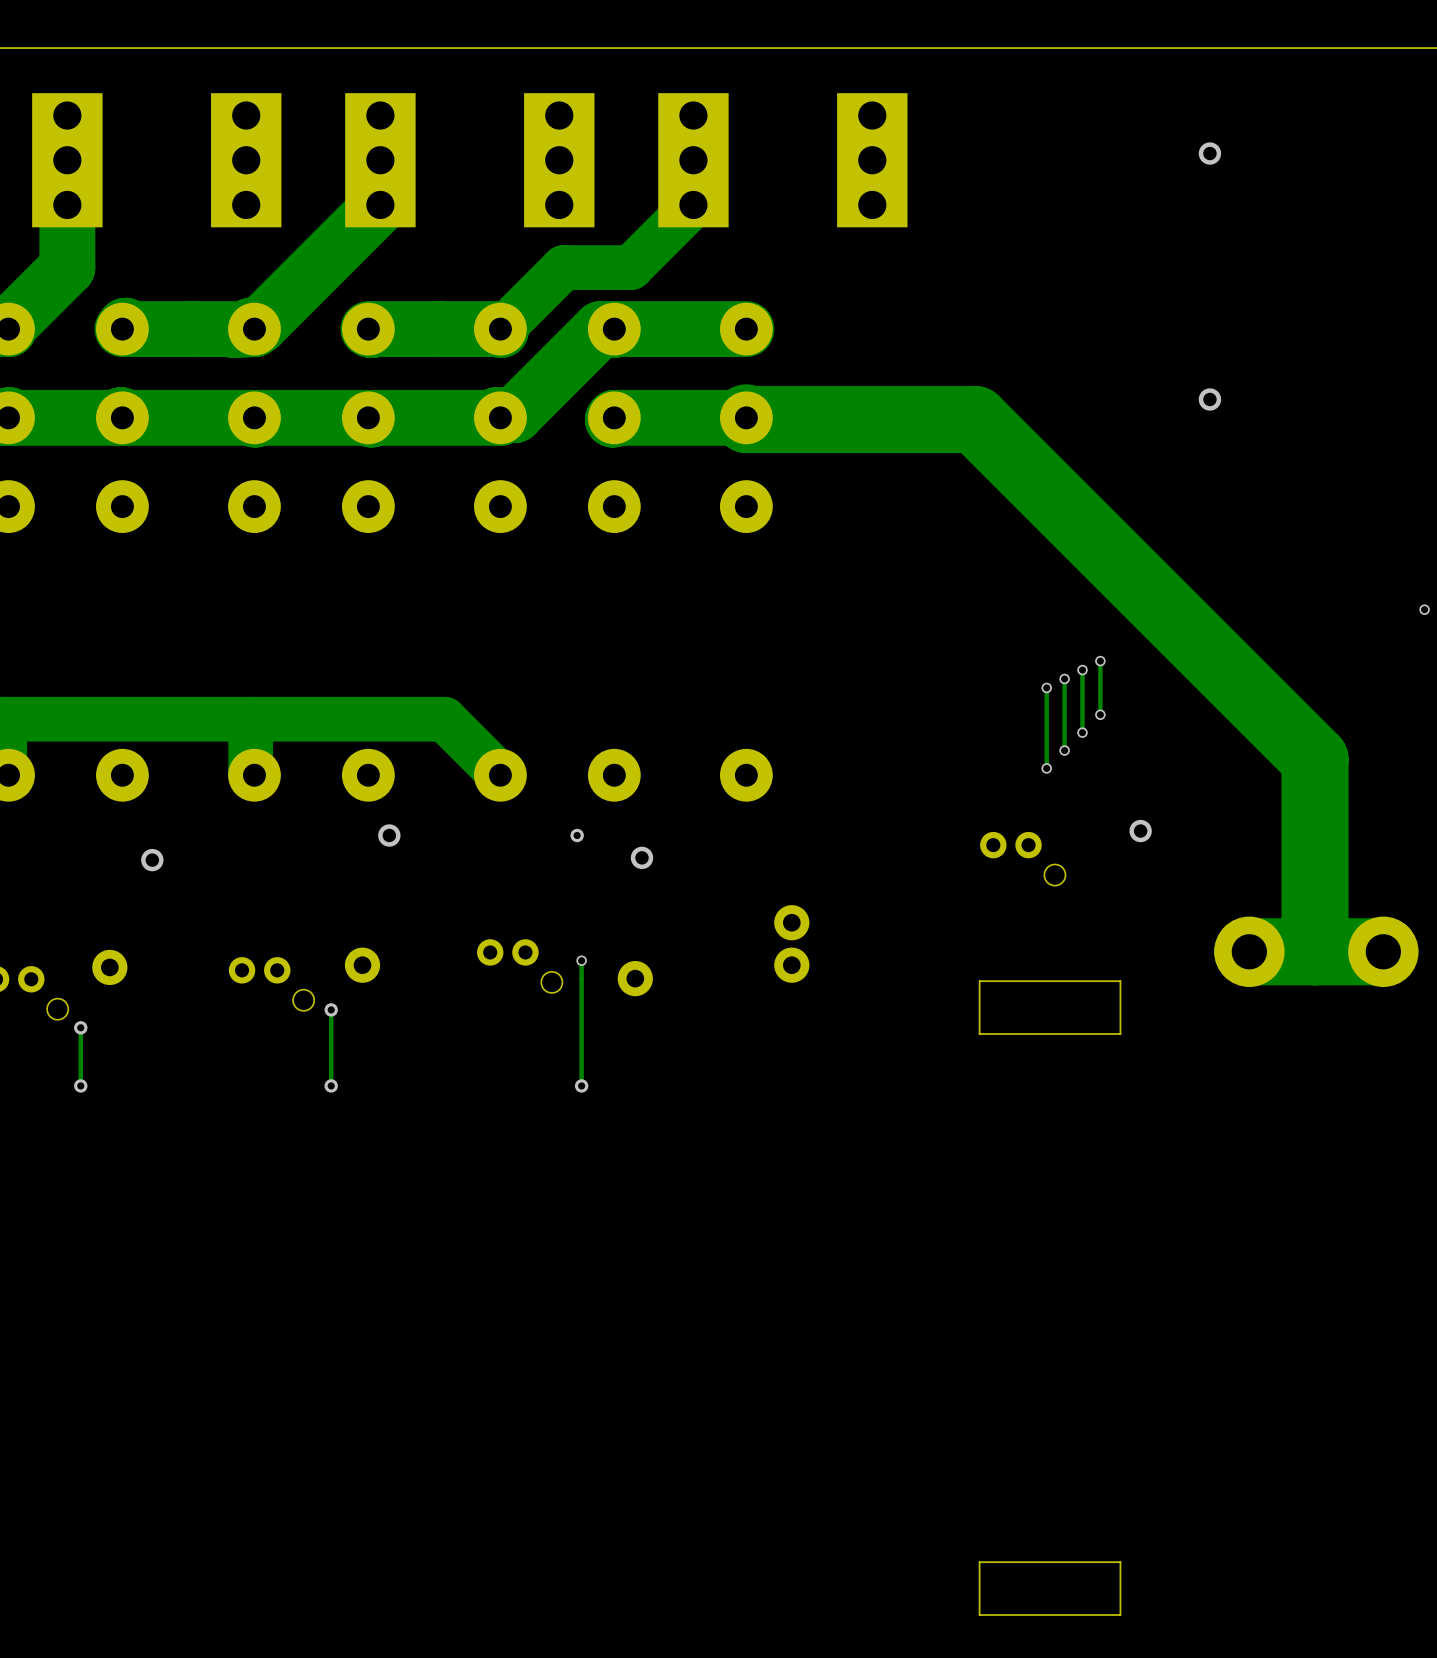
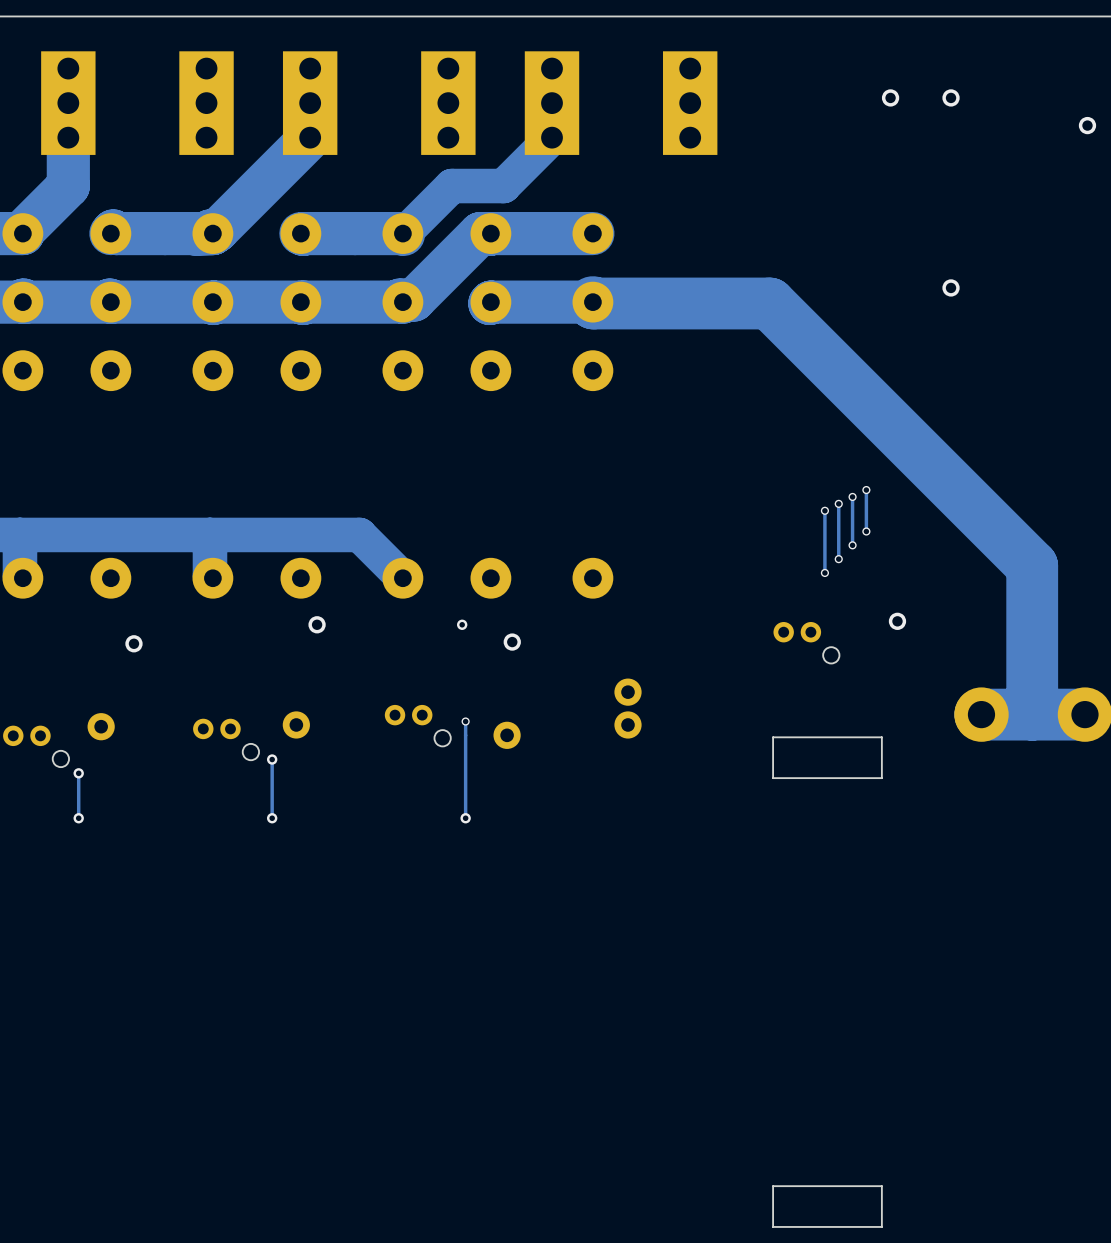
via: none -> (890, 97)
via: none -> (1087, 125)

